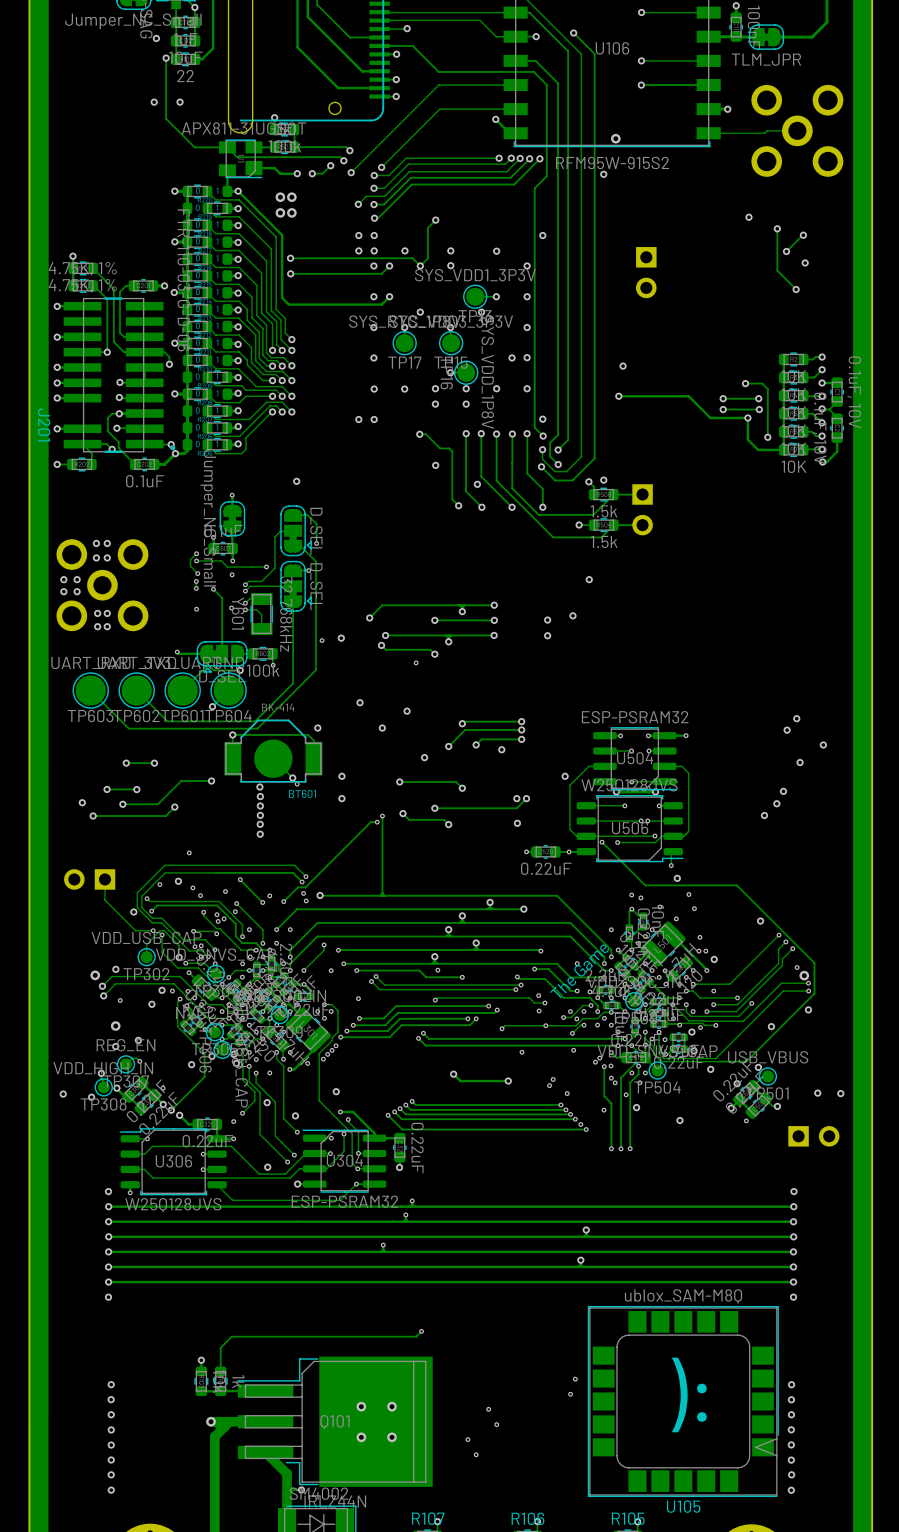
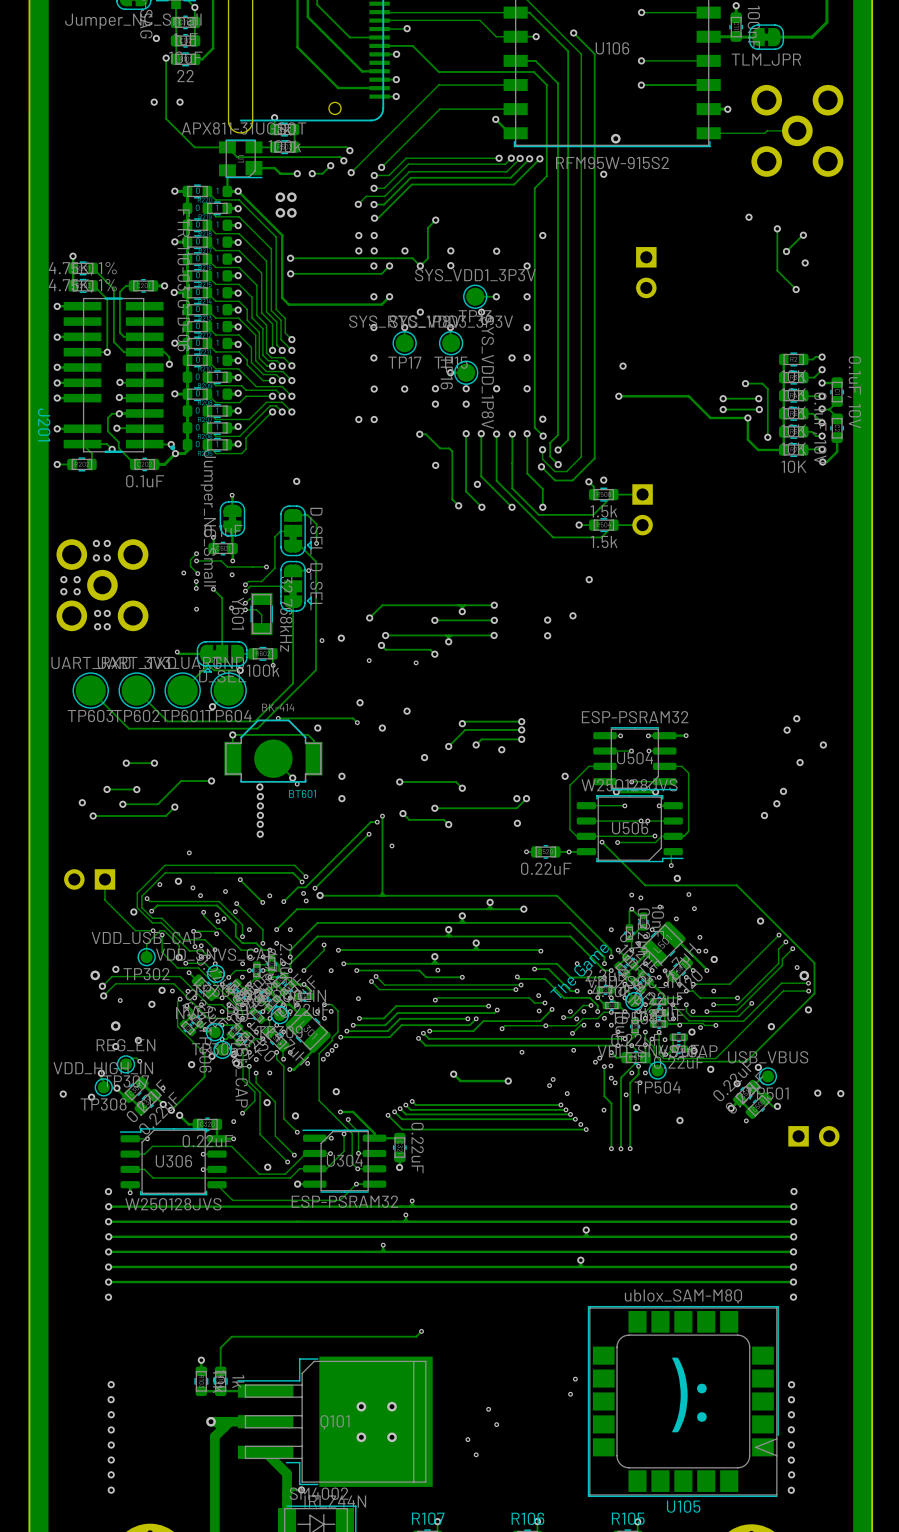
via: none -> (183, 573)
via: none -> (369, 660)
track: none -> (278, 718) (353, 718) (357, 722)
via: none -> (278, 718)
via: none -> (357, 722)
track: none -> (369, 834) (315, 888)
via: none -> (369, 834)
via: none -> (392, 845)
via: none -> (315, 888)
track: none -> (552, 1009) (540, 1021) (483, 1021) (473, 1031) (429, 1031)
via: none -> (552, 1009)
via: none -> (429, 1031)

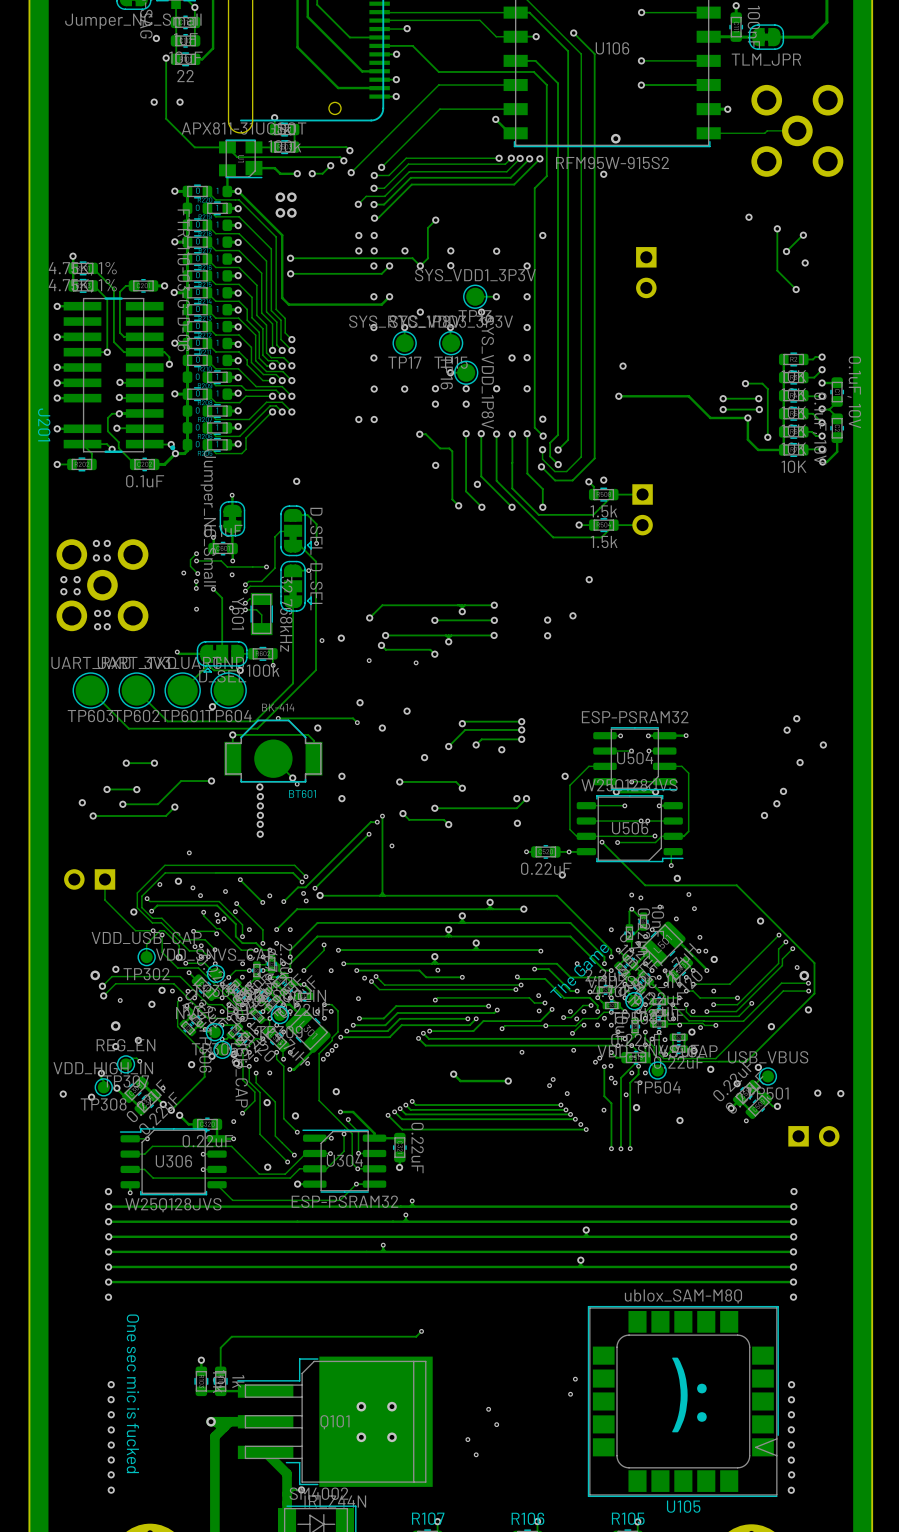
via: none -> (562, 874)
via: none -> (364, 978)
text: none -> One sec mic is fucked (132, 1393)

